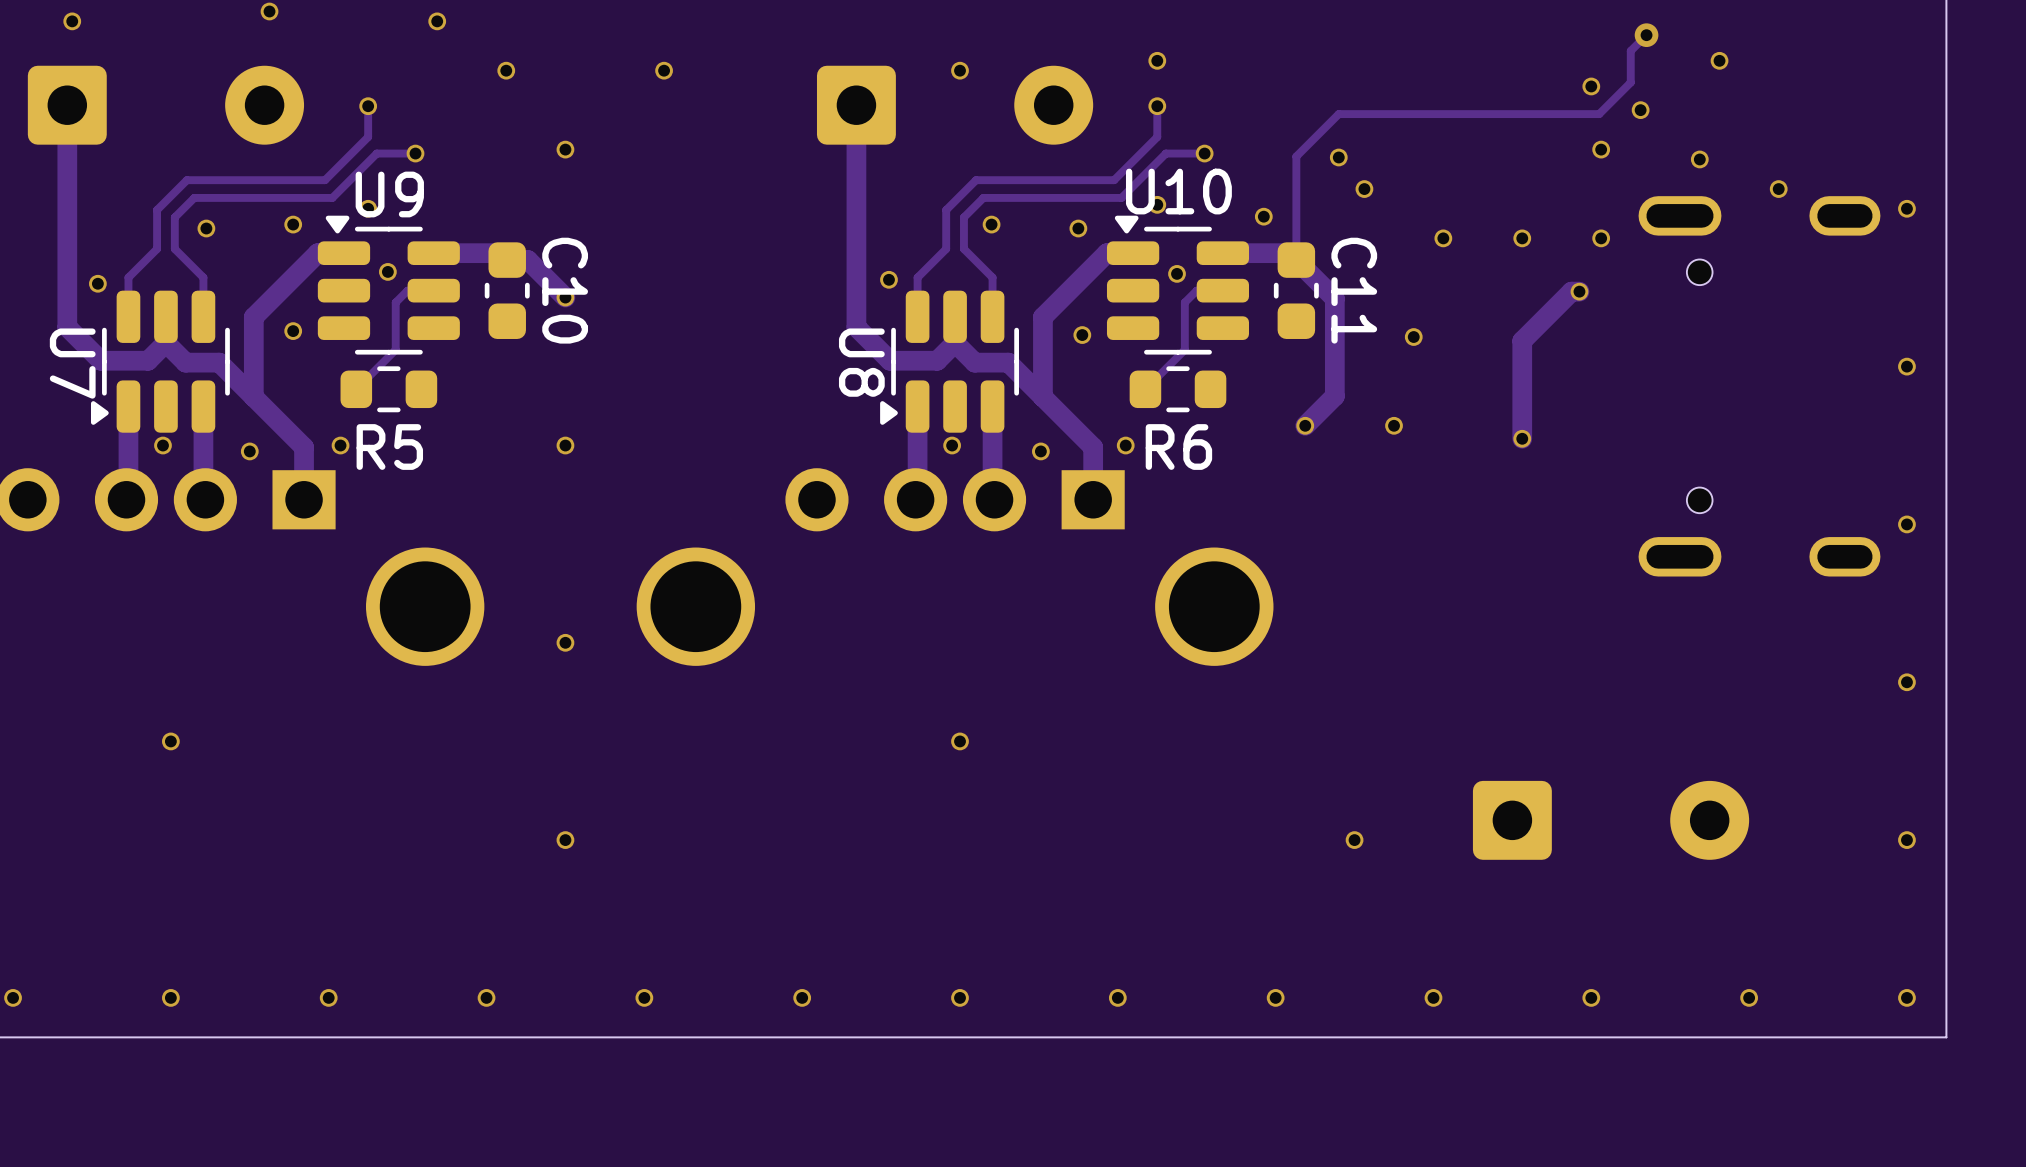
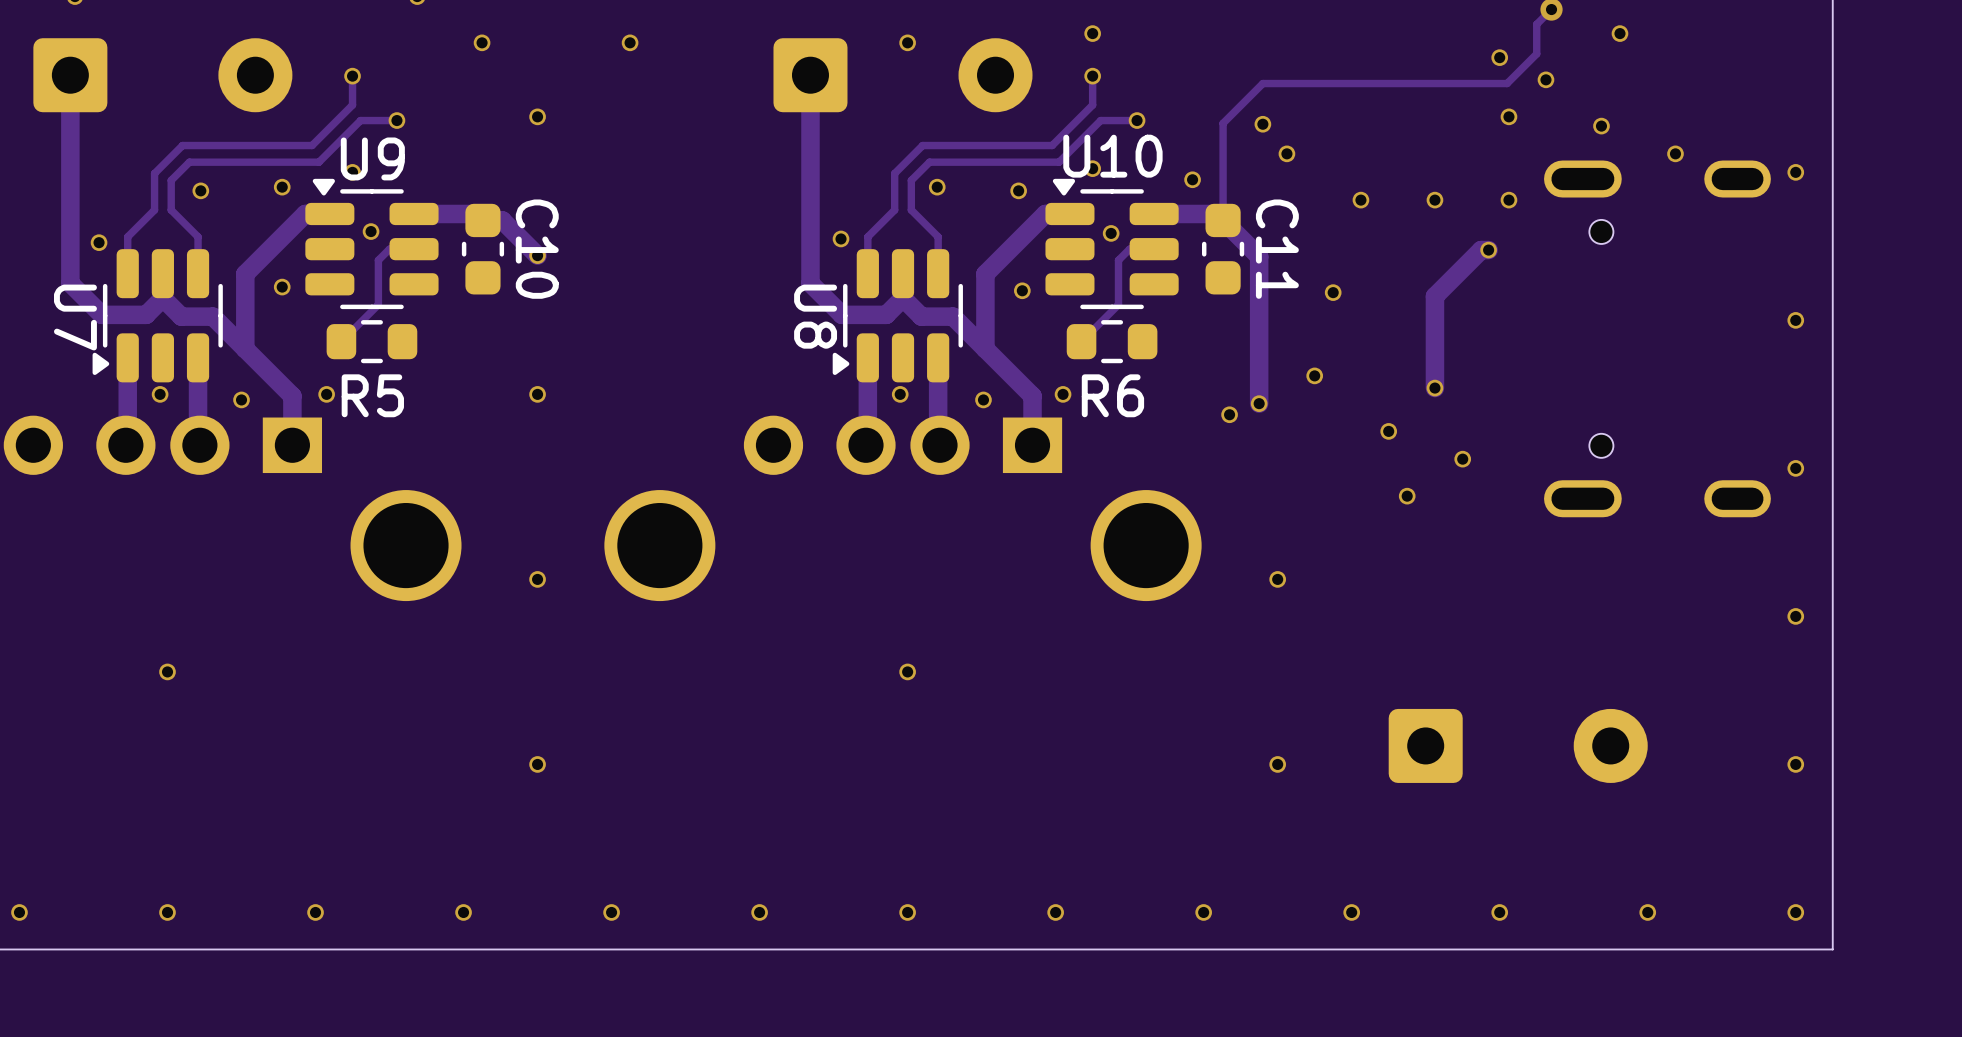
track: (1334, 396) (1305, 425) -> (1259, 348) (1259, 403)
via: (1305, 425) -> none
via: none -> (1259, 403)
via: none -> (1229, 414)
via: none -> (1388, 431)
via: none -> (1462, 459)
via: none -> (1407, 496)
via: none -> (1277, 579)

